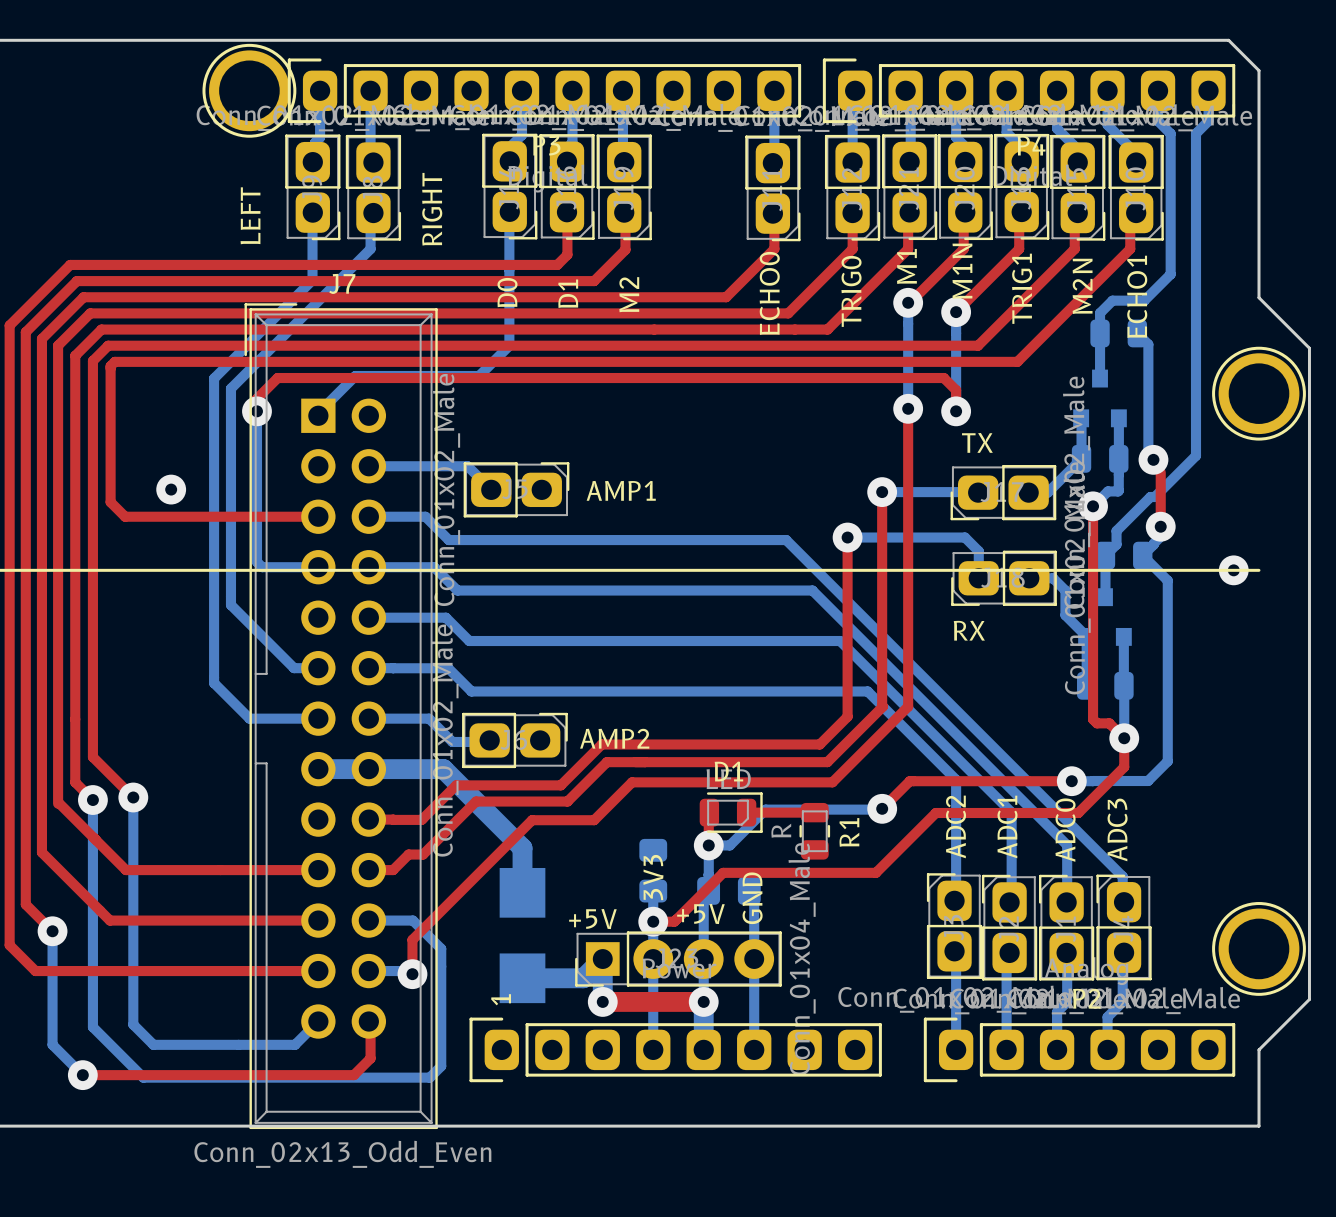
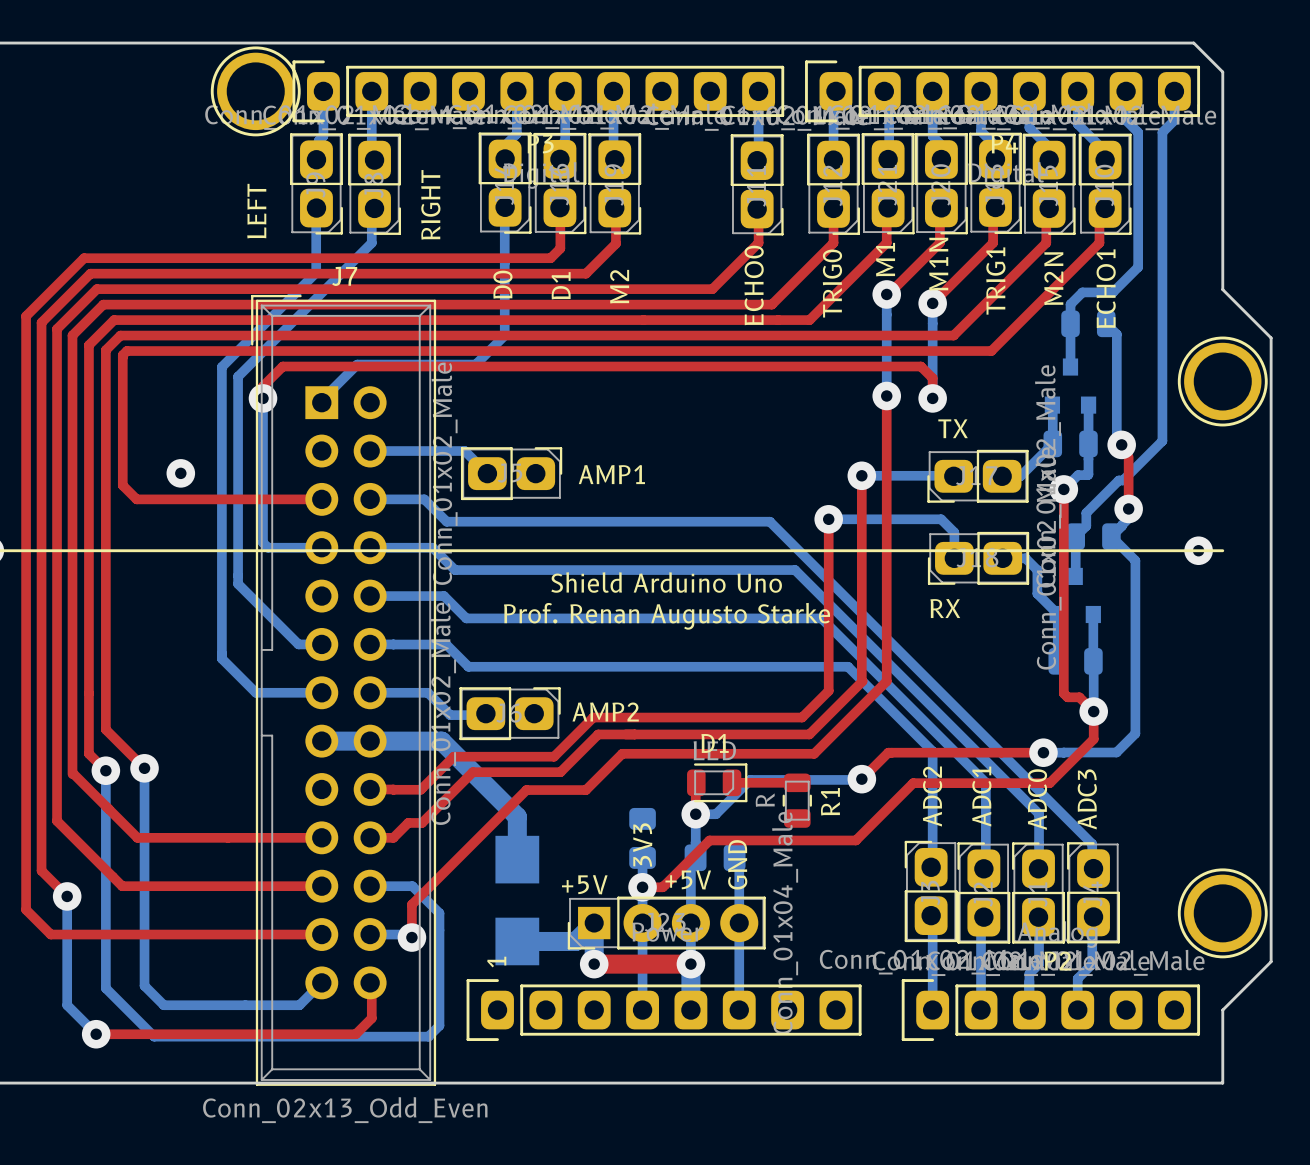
text: none -> Shield Arduino Uno (666, 582)
text: none -> Prof. Renan Augusto Starke (667, 616)

